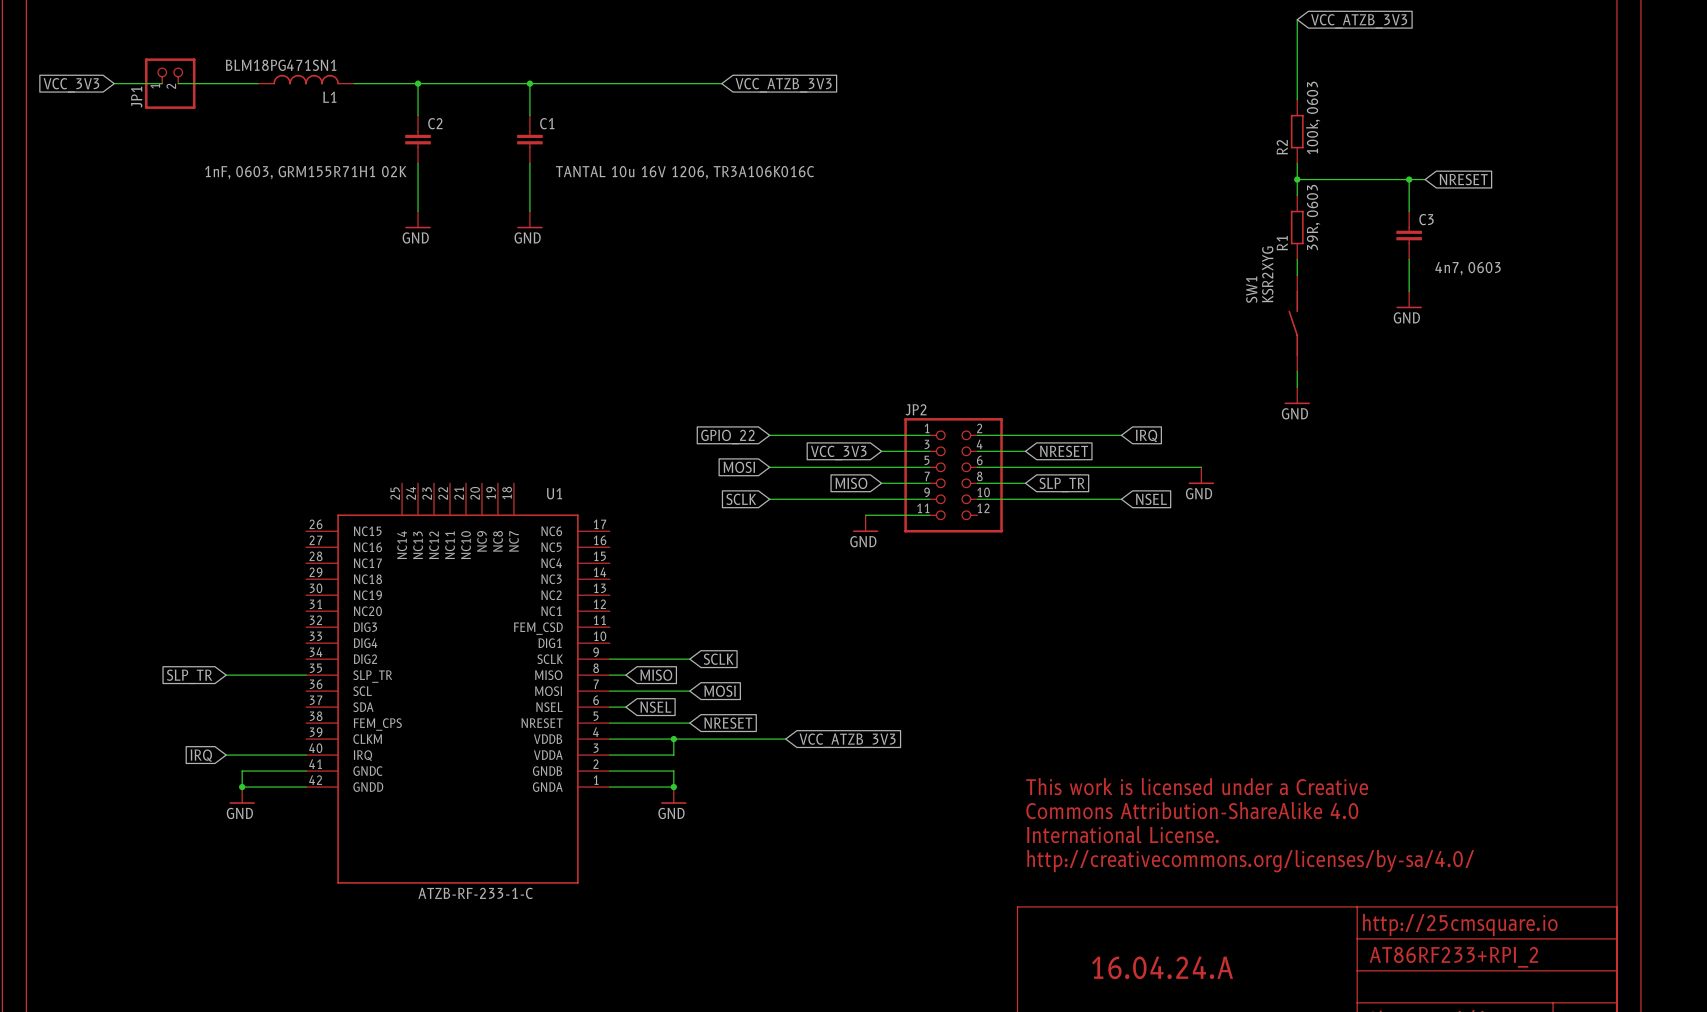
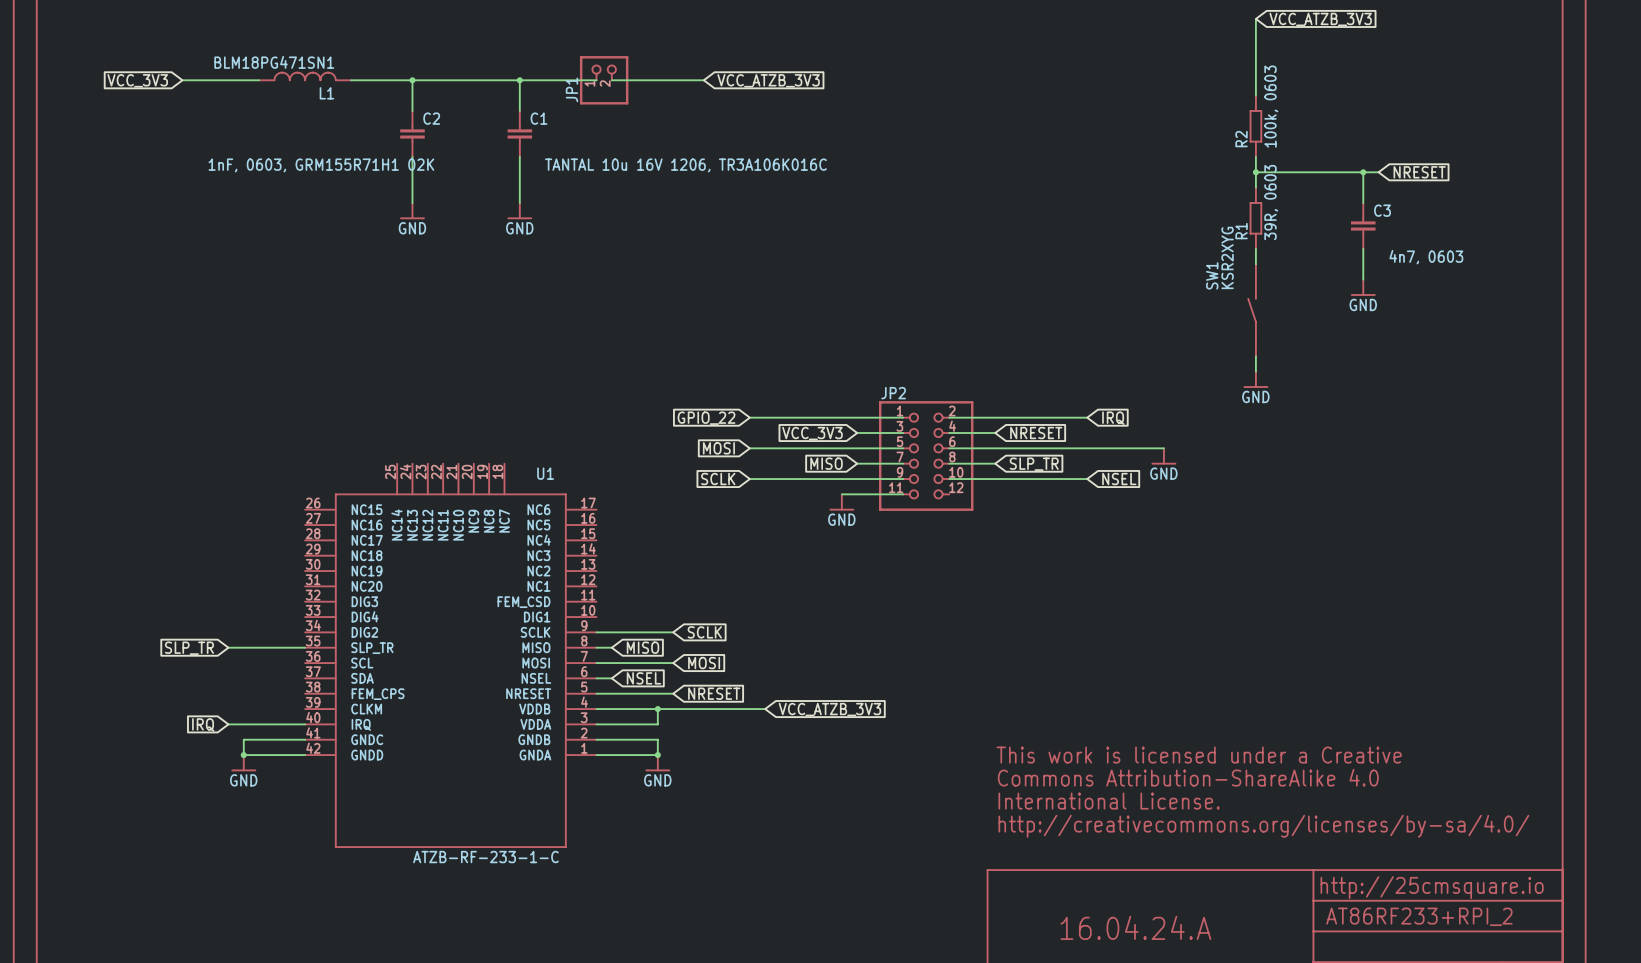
wire: (114, 83) (162, 83) -> none
JP1 position: (170, 83) -> (604, 80)
wire: (609, 83) (625, 83) -> none
global label position: VCC_3V3 (71, 85) -> VCC_3V3 (137, 80)

